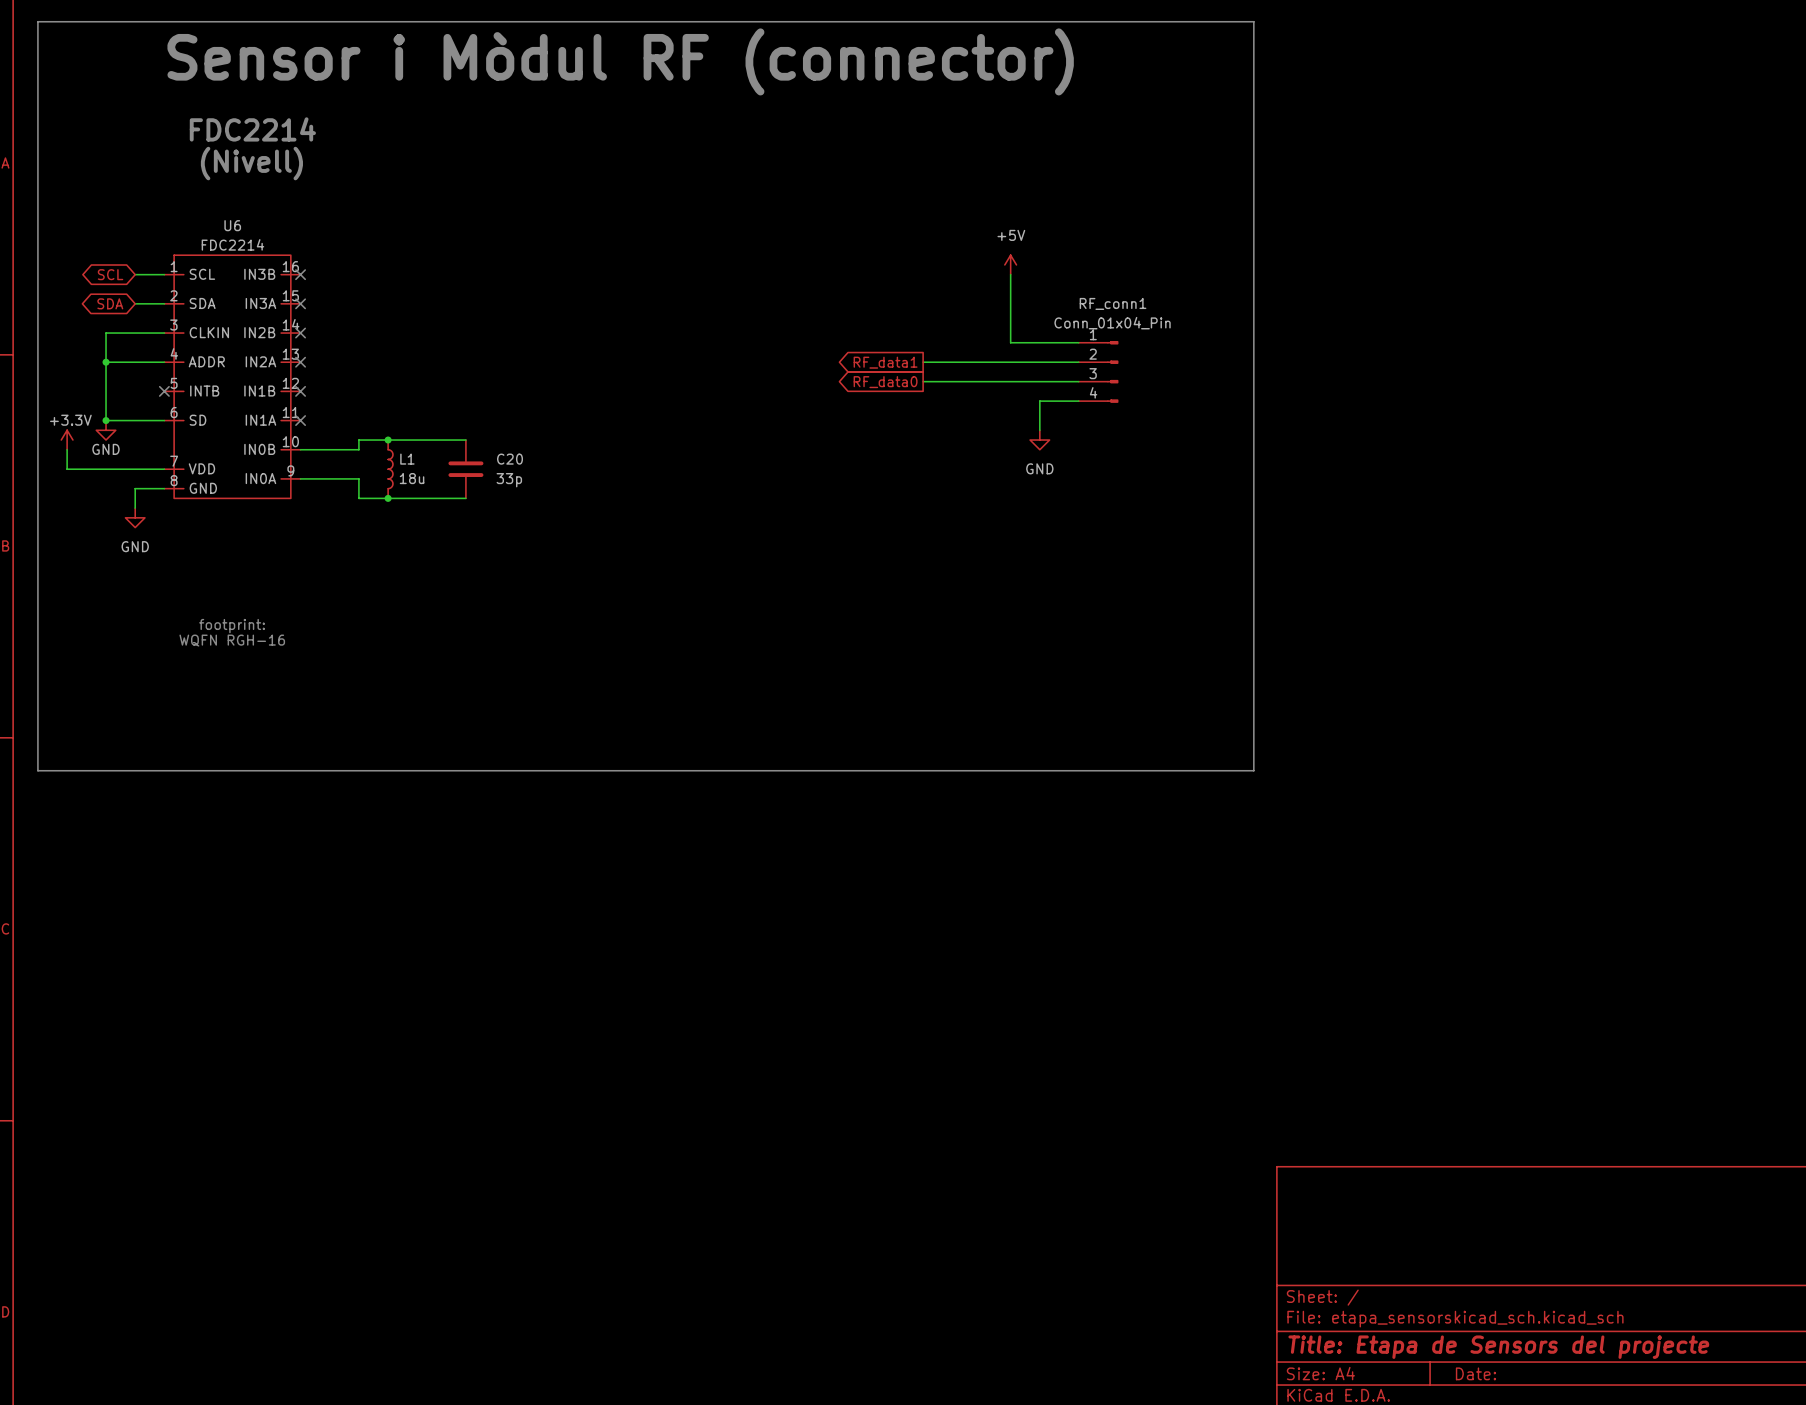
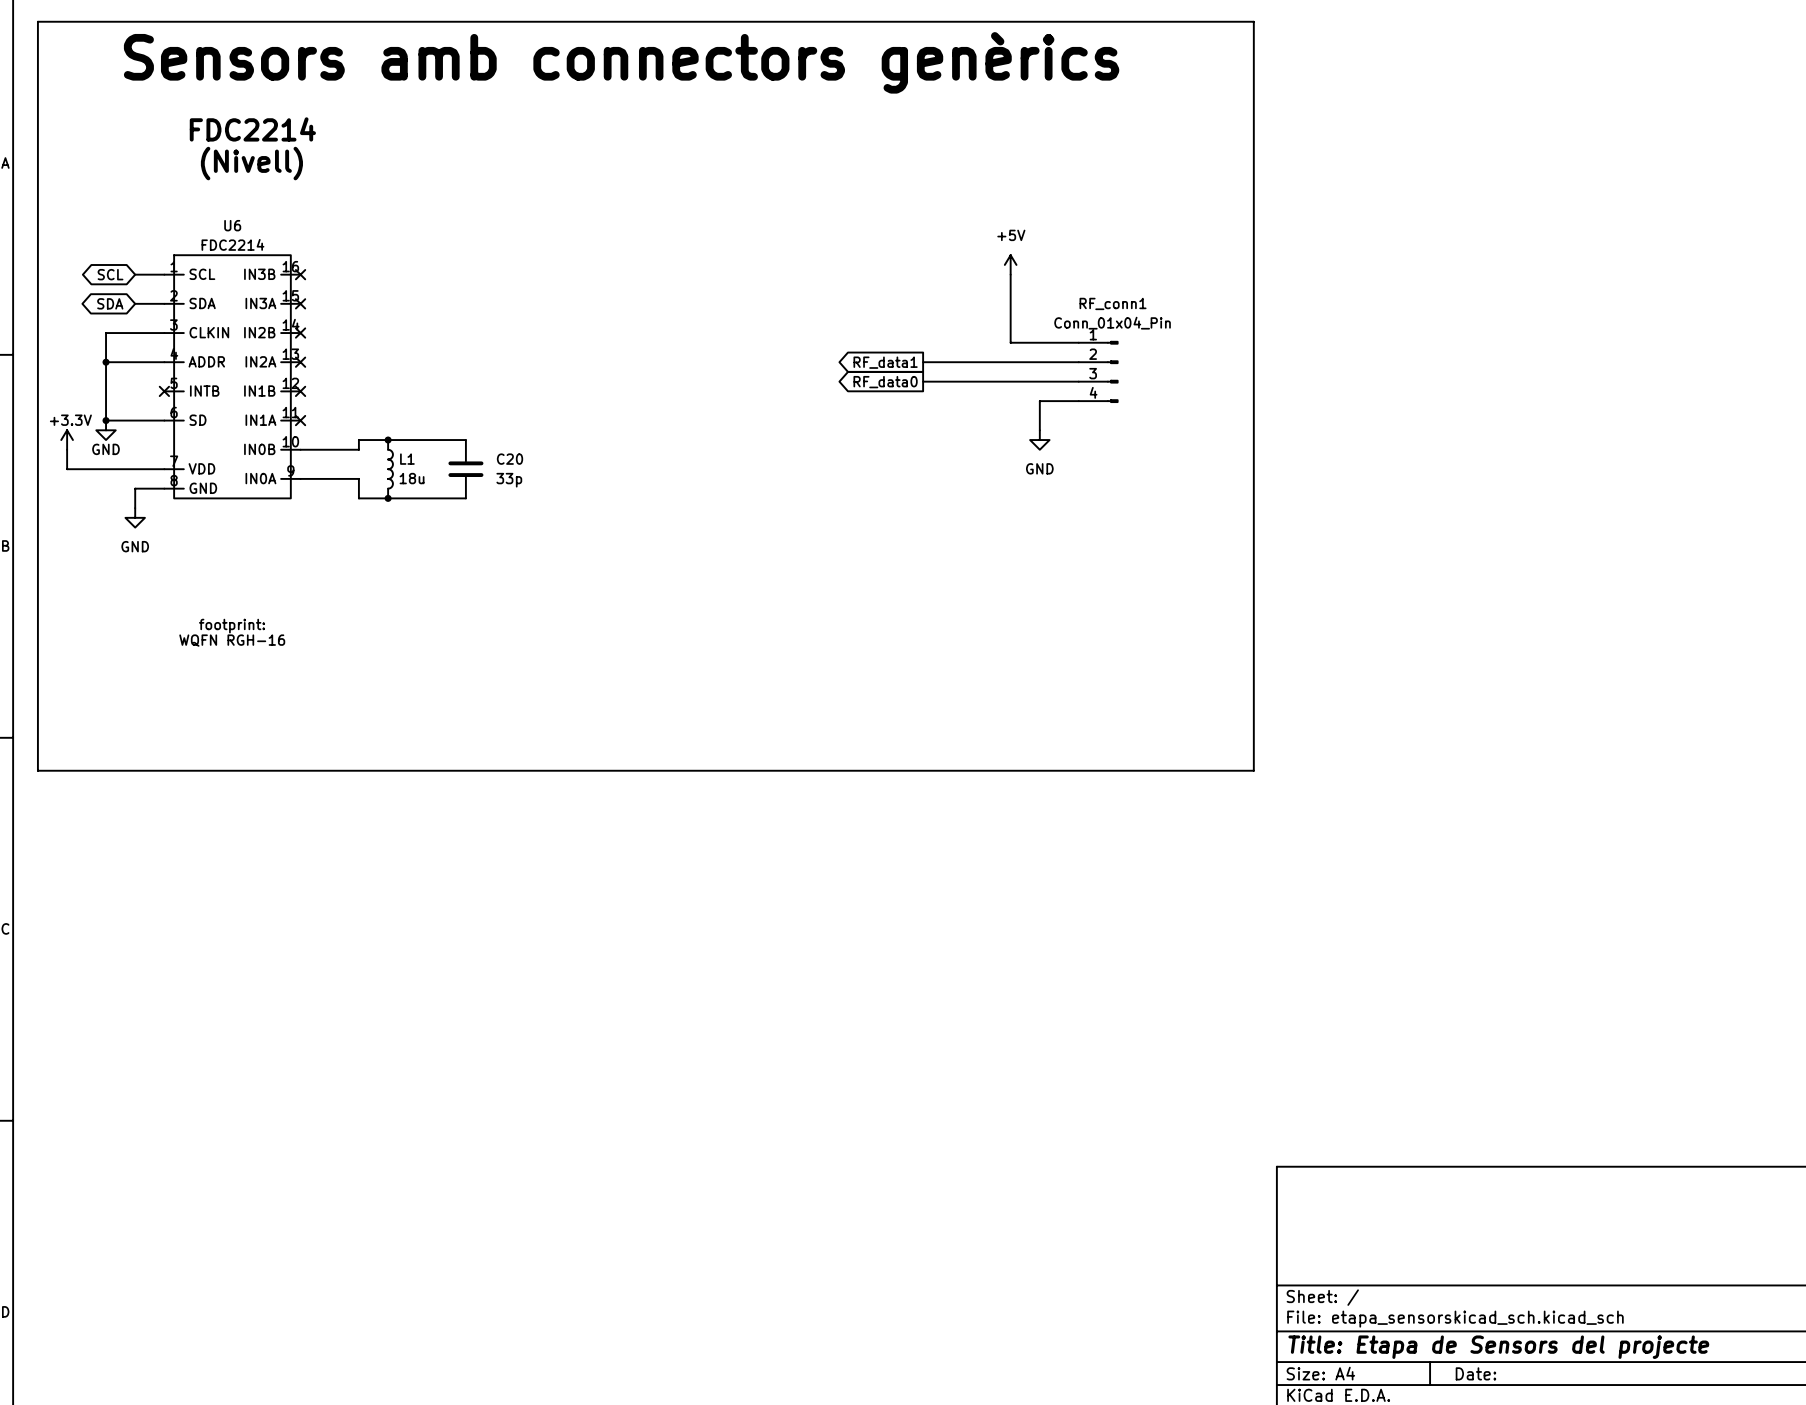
text: Sensor i Mòdul RF (connector) (620, 61) -> Sensors amb connectors genèrics (621, 62)

